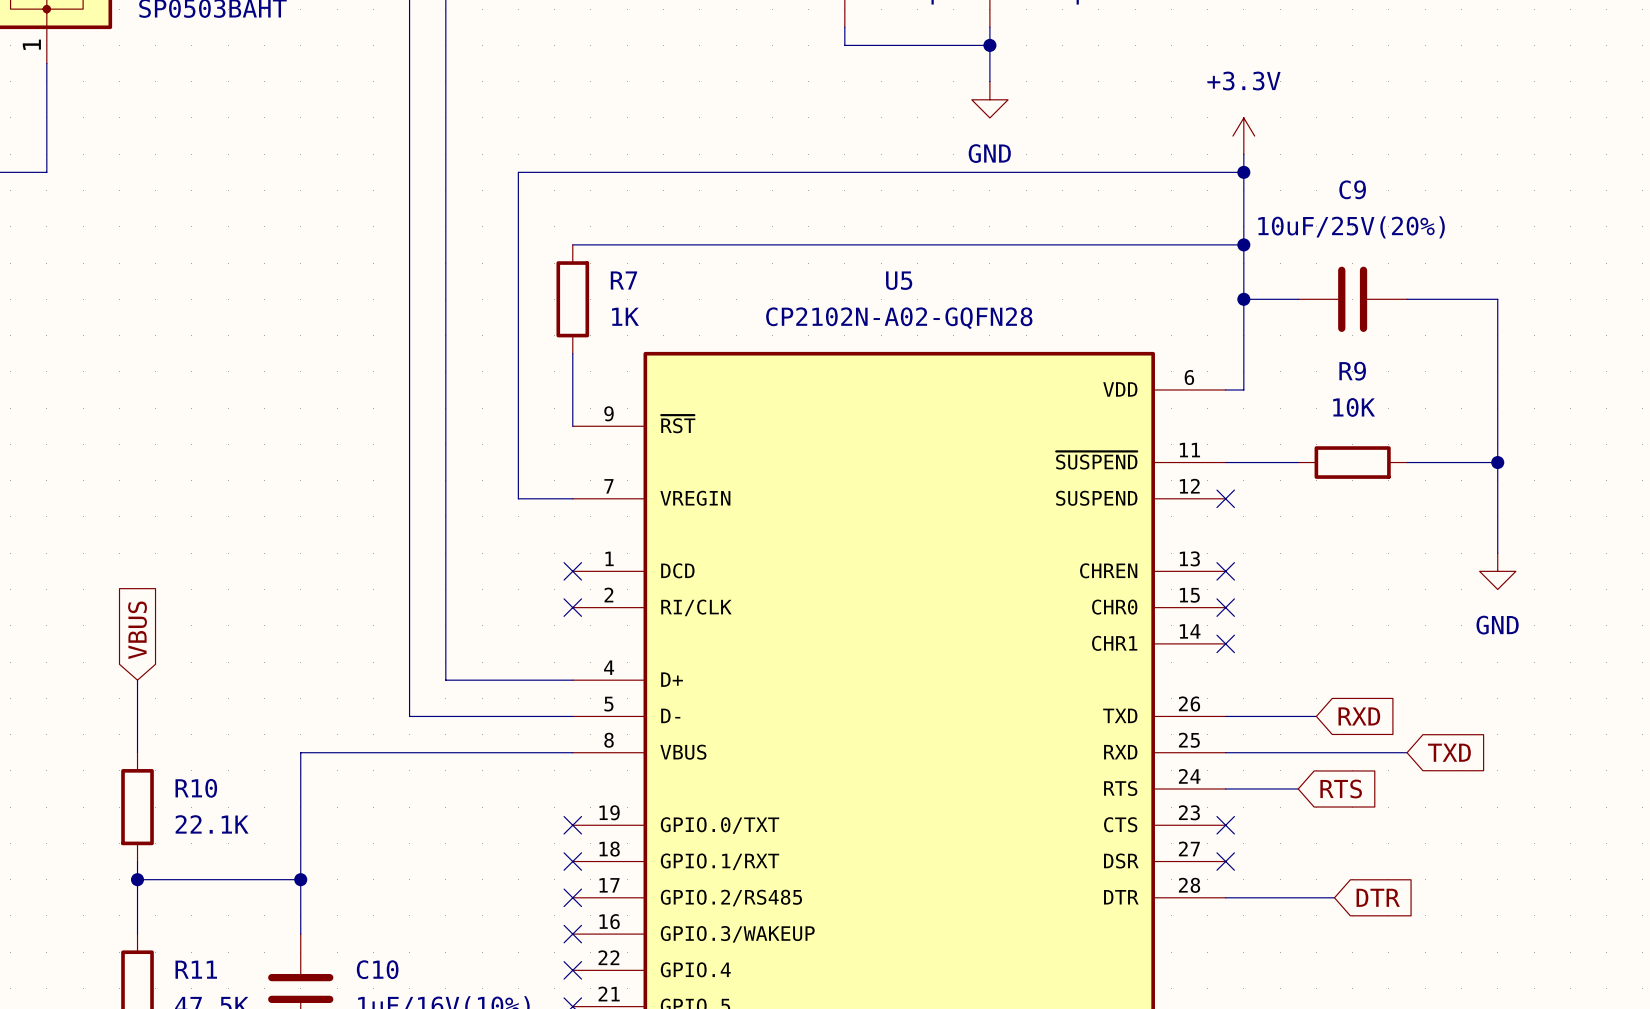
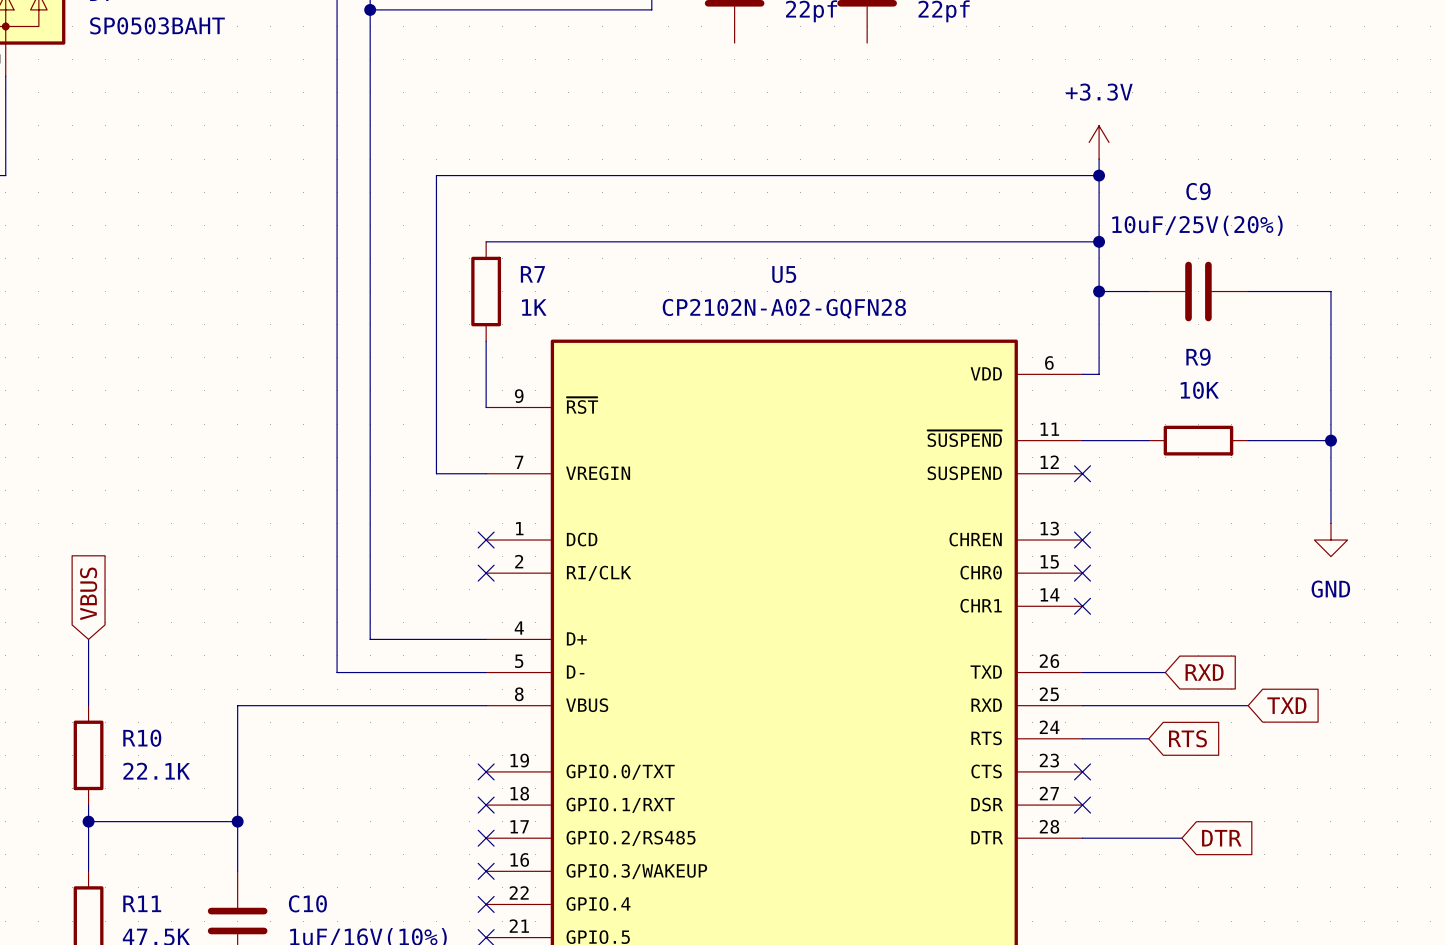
wire: (844, 27) (844, 45) (989, 45) -> none
wire: (989, 27) (989, 81) -> none
junction: (989, 45) -> none
power symbol: GND (989, 99) -> none

